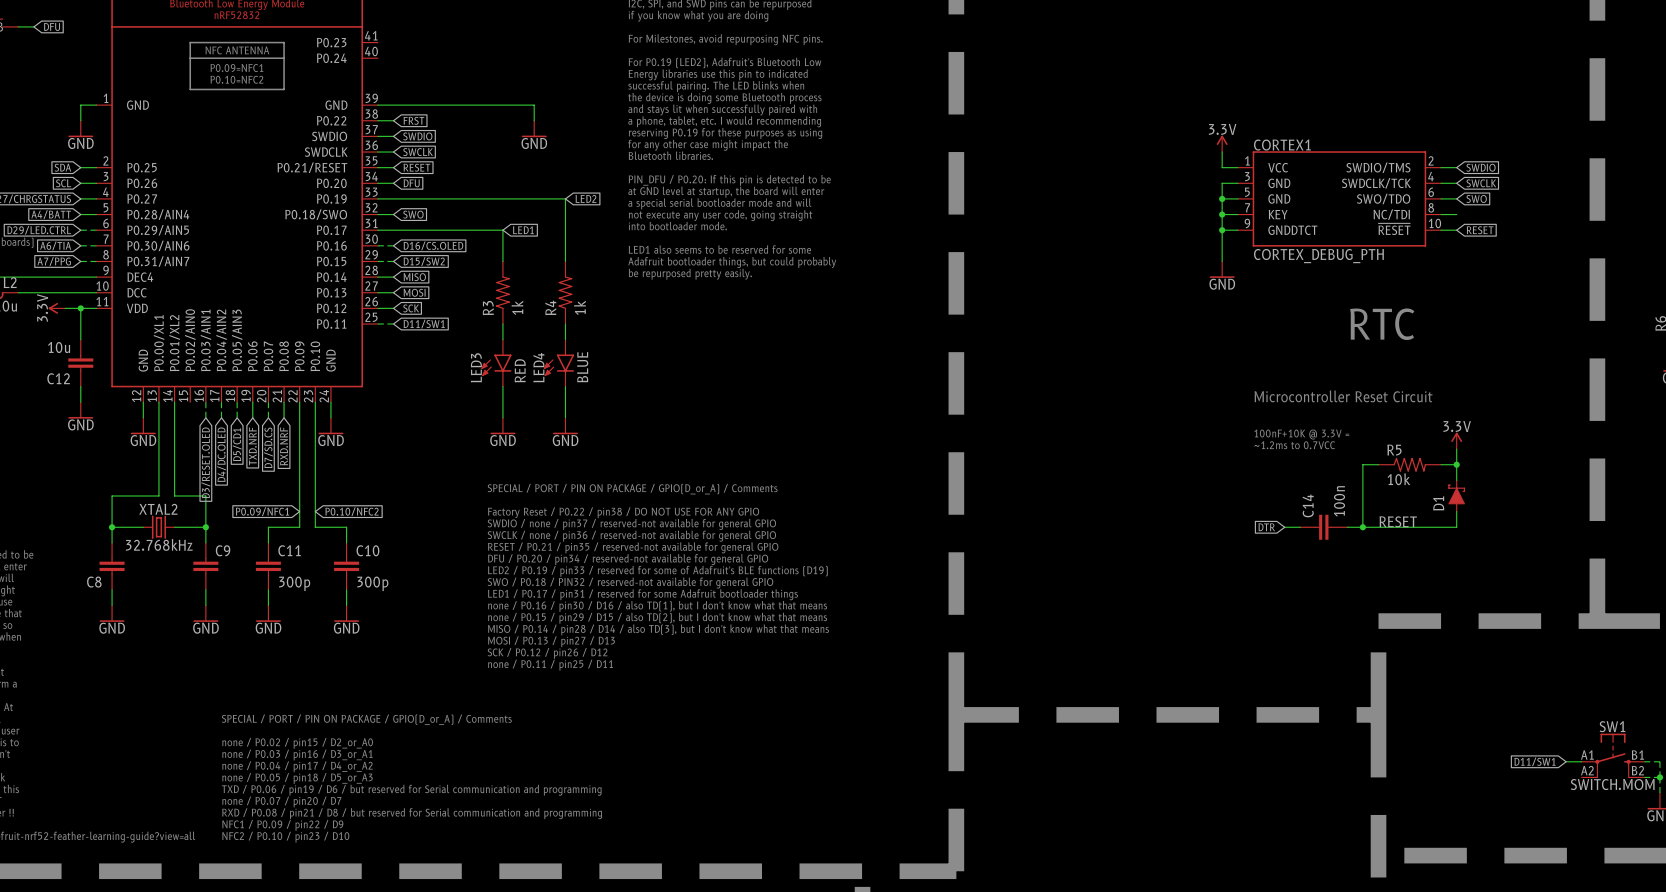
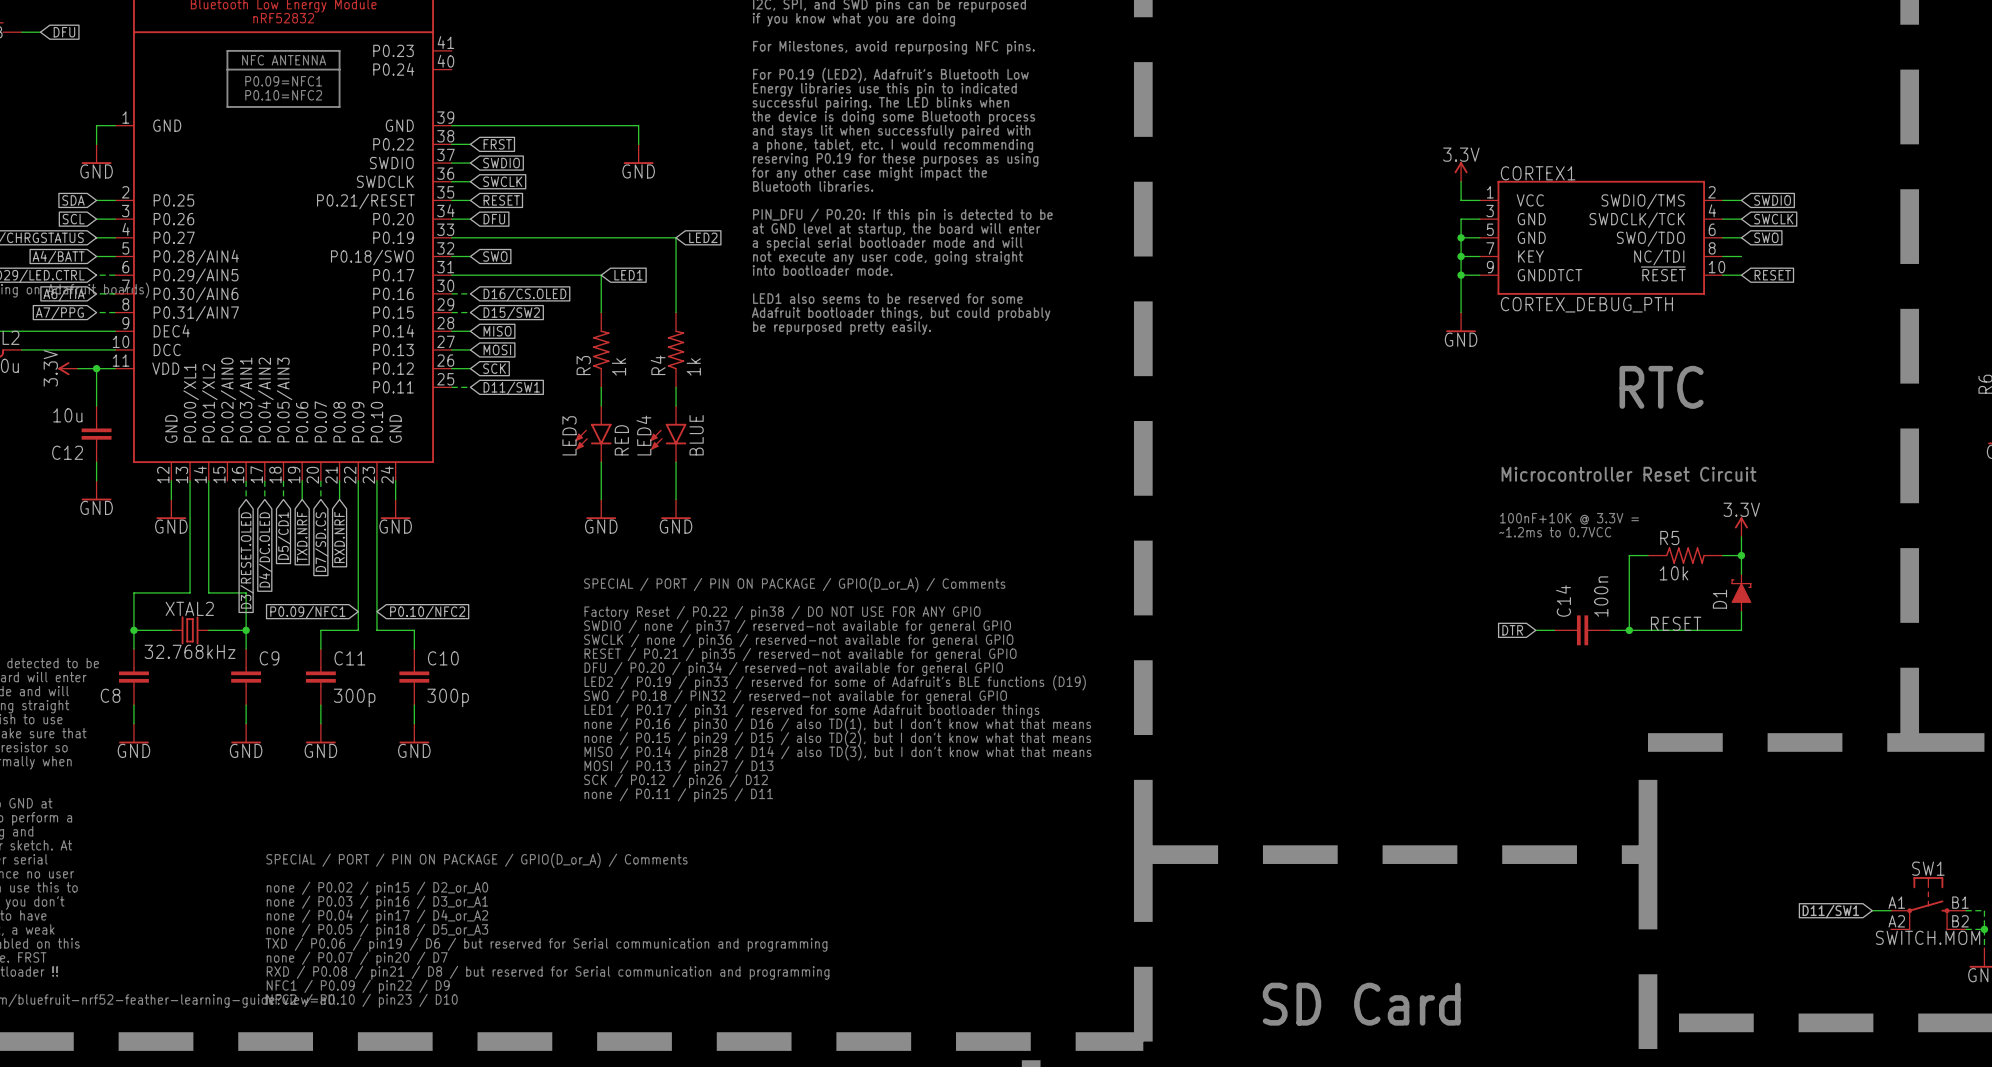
text: none -> SD Card (1361, 1004)

